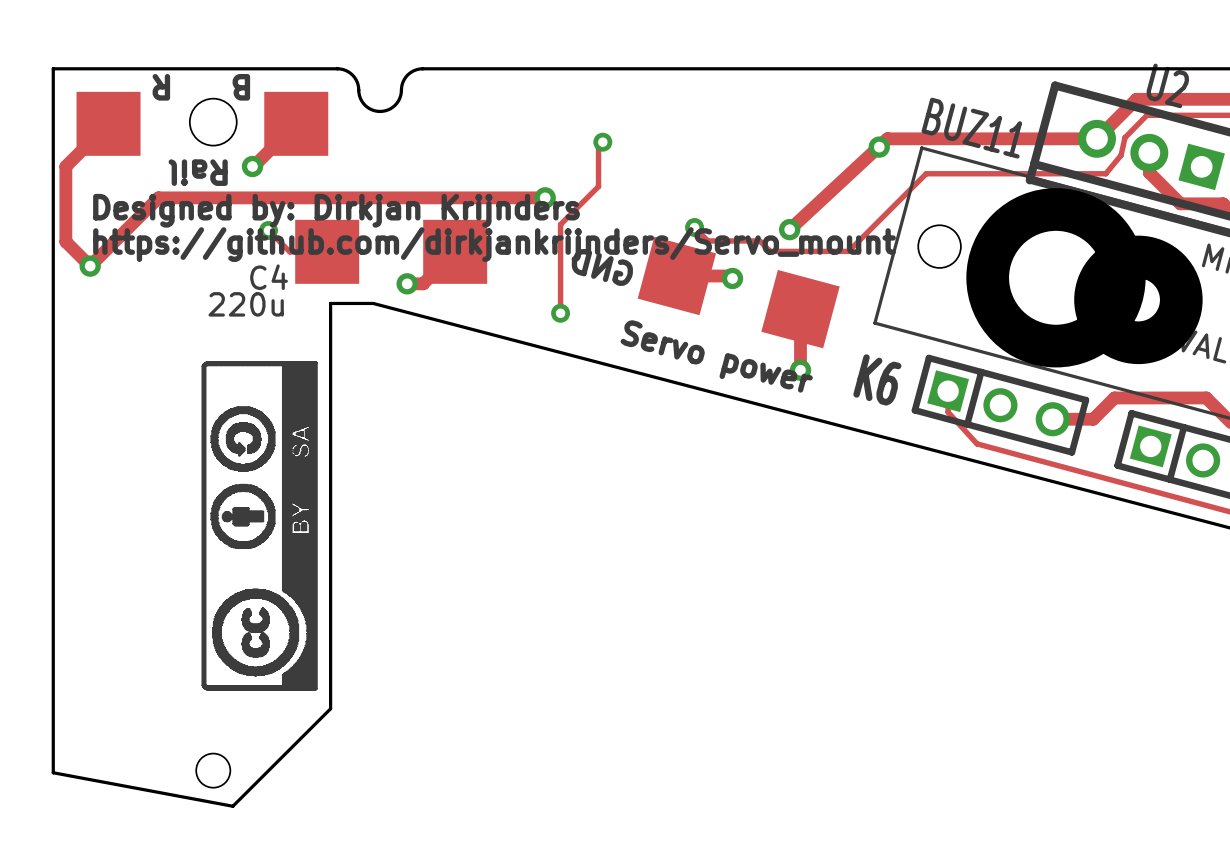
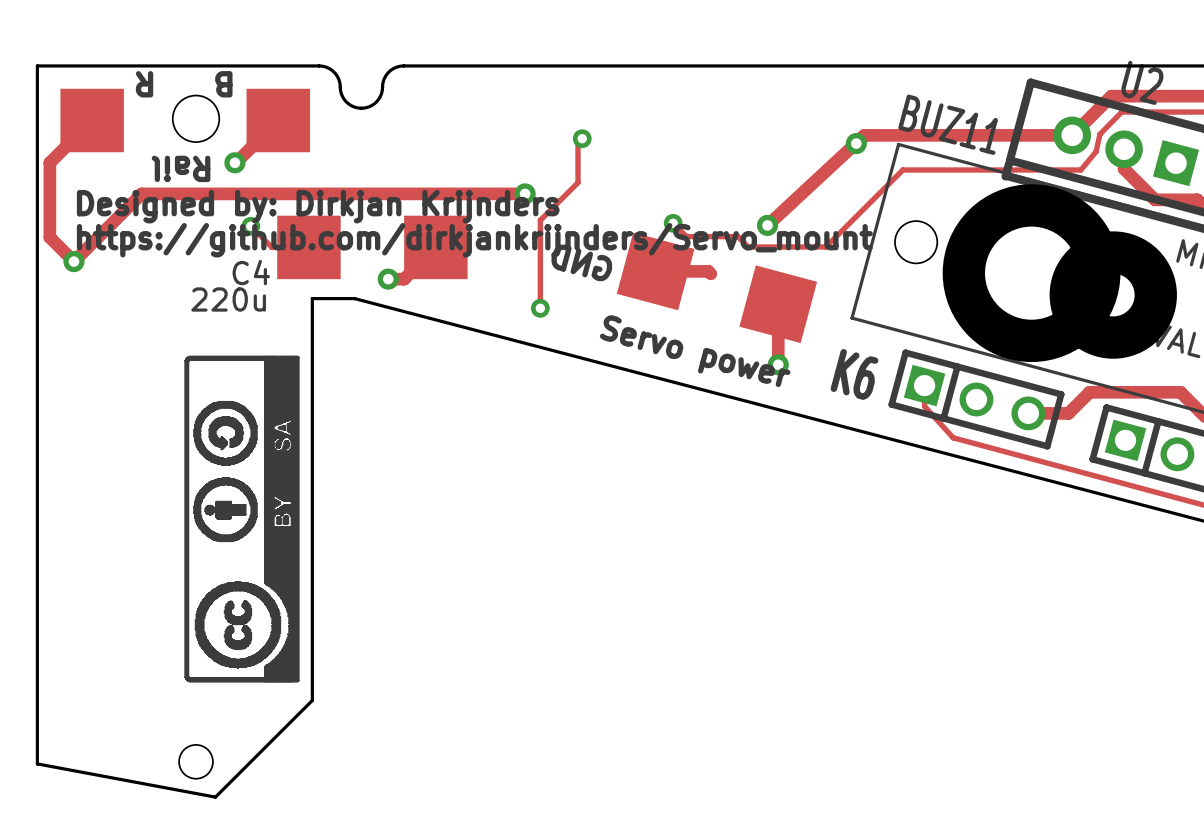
via: (732, 278) -> none

